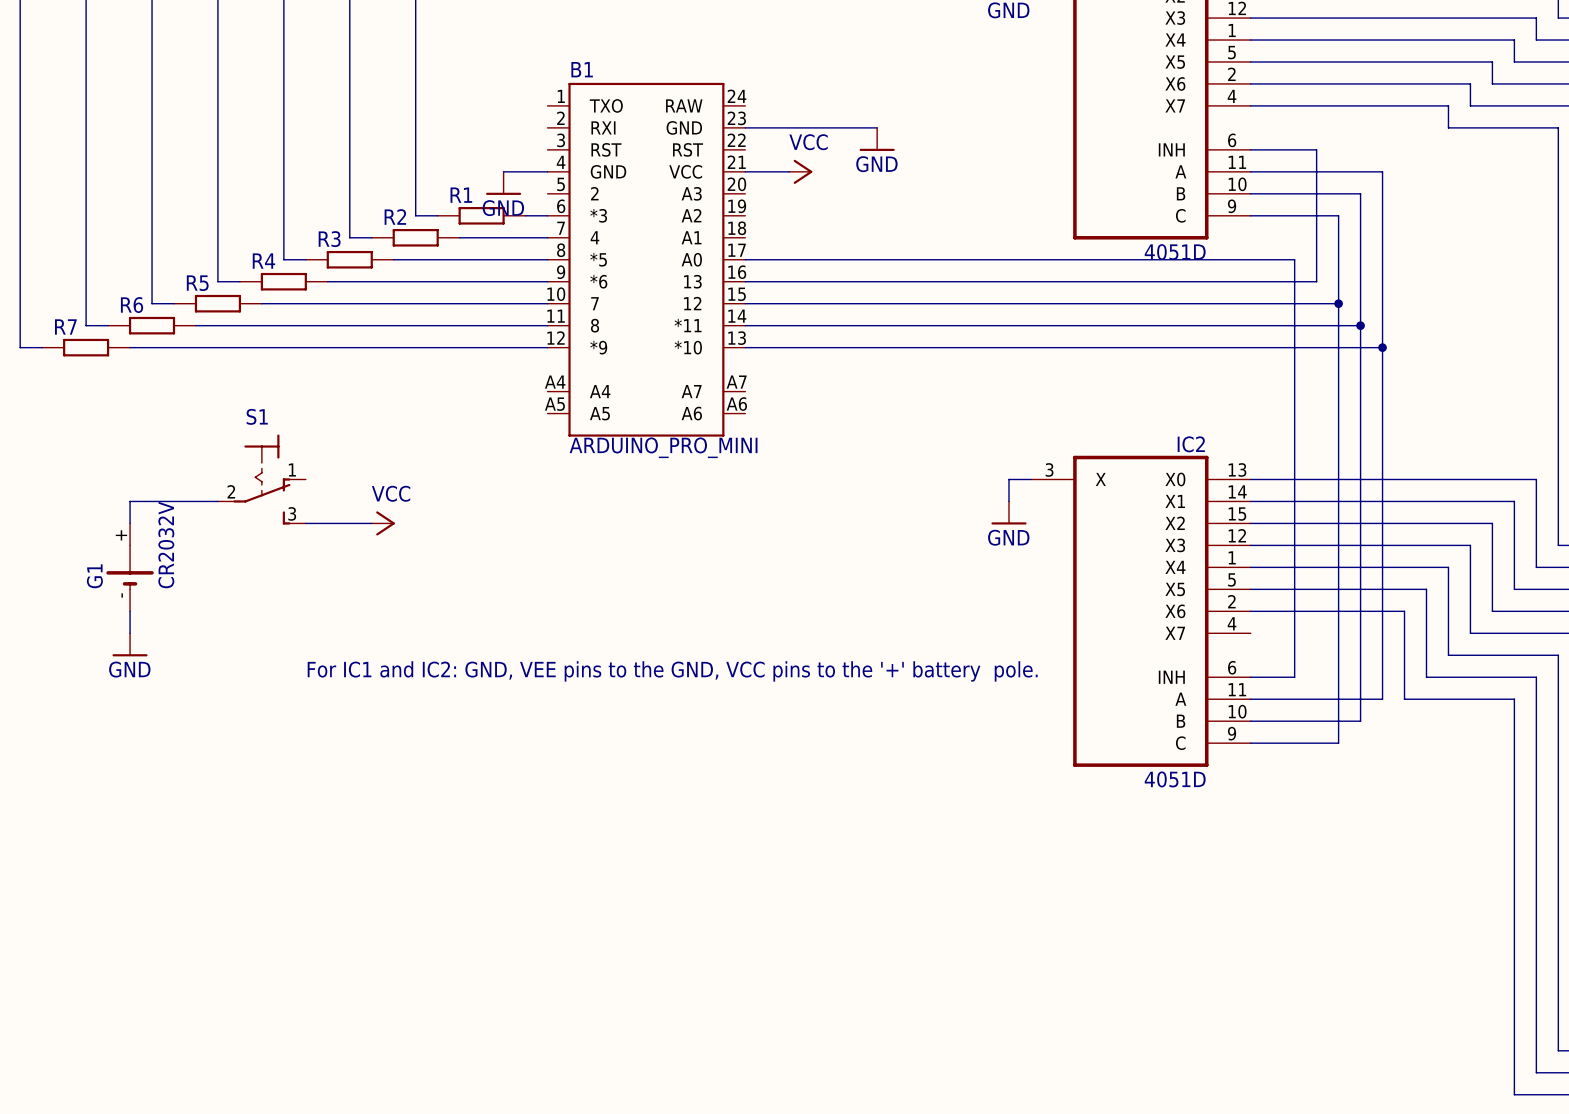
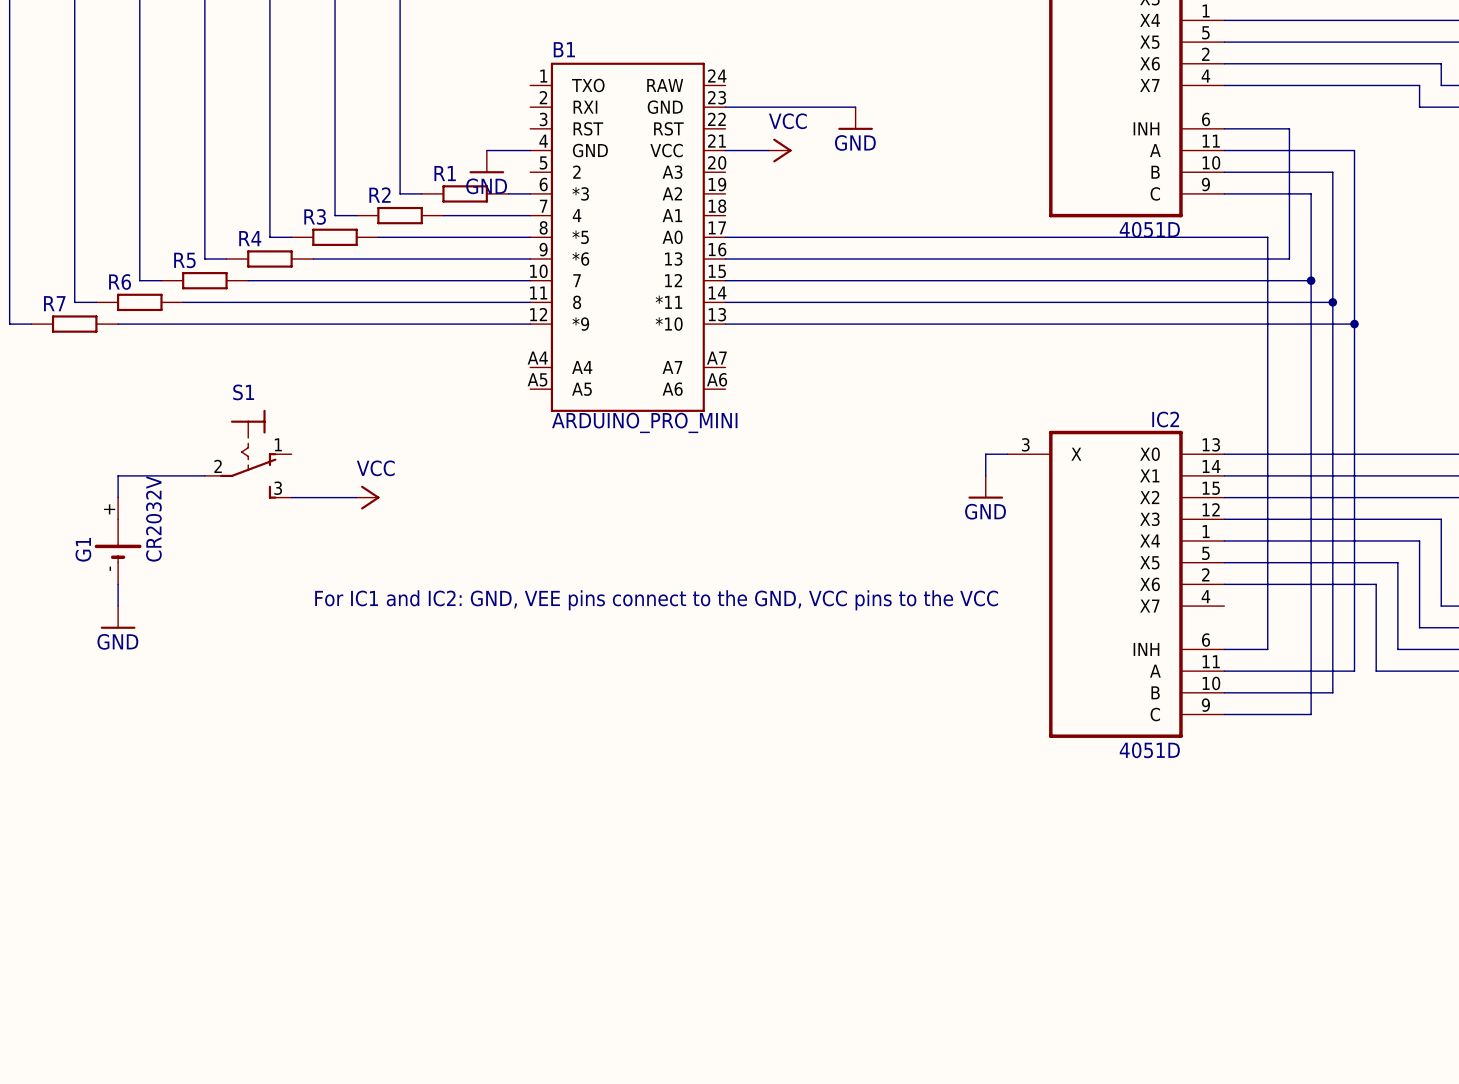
text: none -> For IC1 and IC2: GND, VEE pins connect to the GND, VCC pins to the VCC (656, 600)
text: For IC1 and IC2: GND, VEE pins to the GND, VCC pins to the '+' battery pole. (672, 671) -> none

